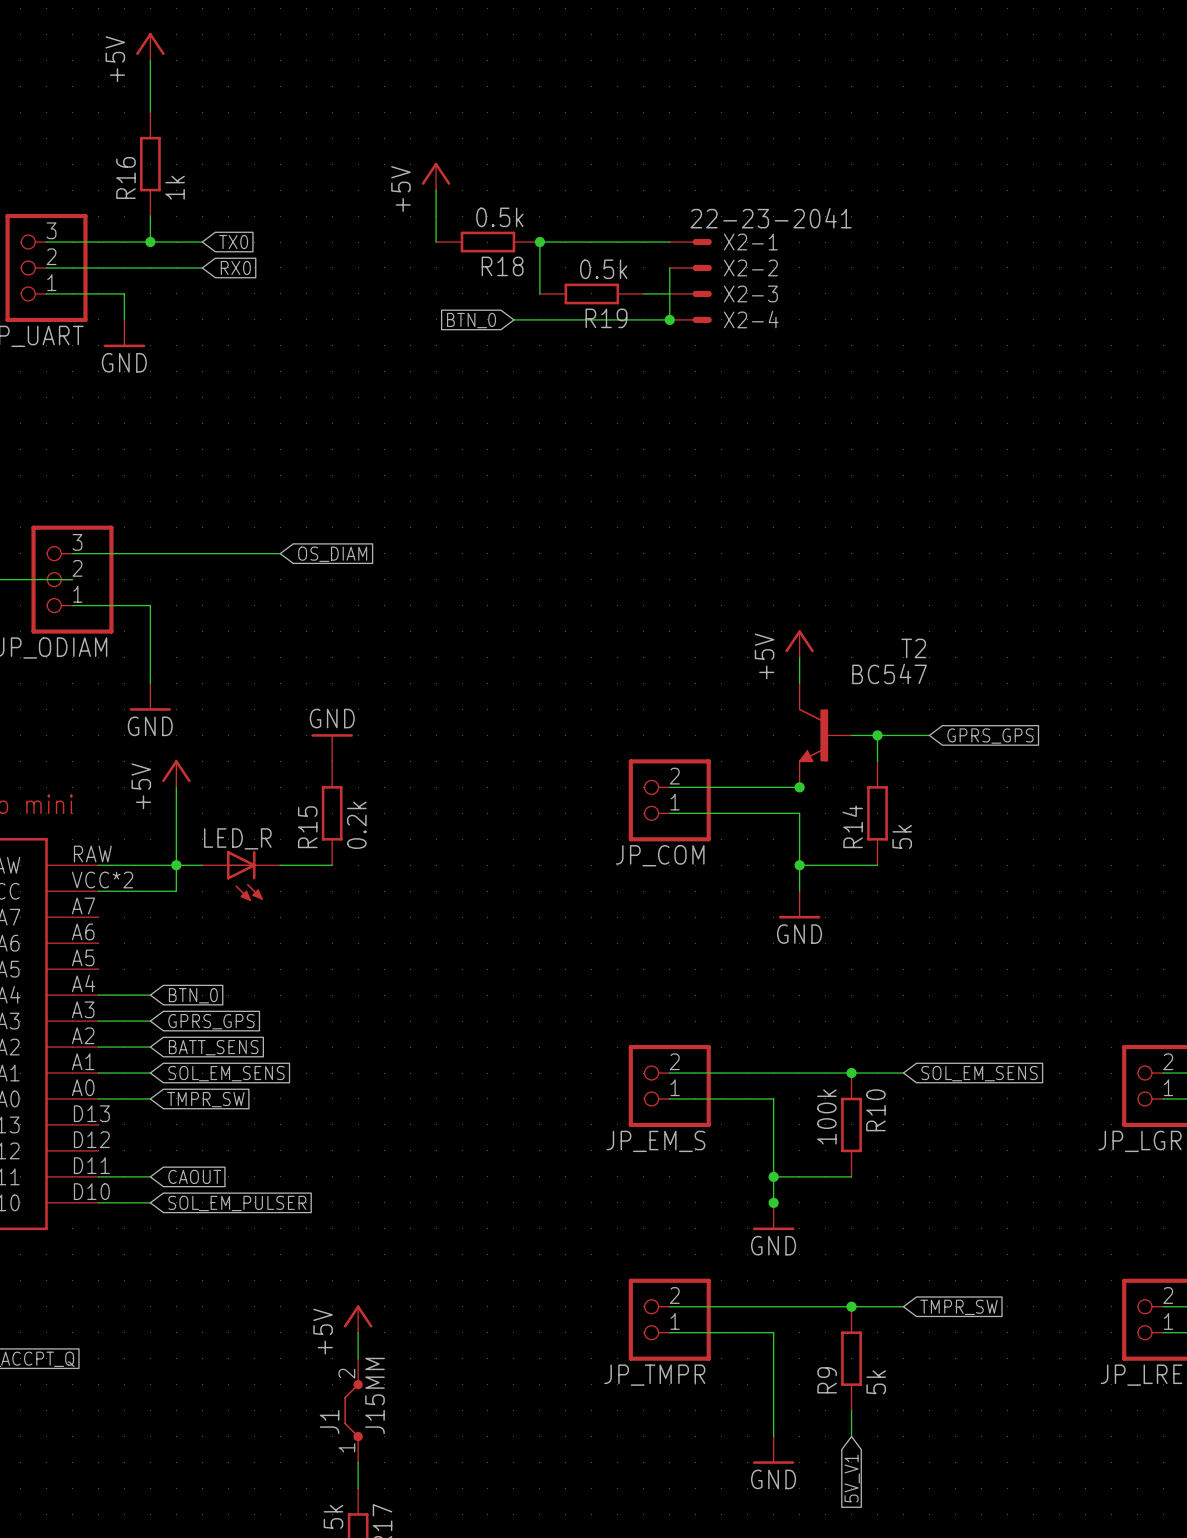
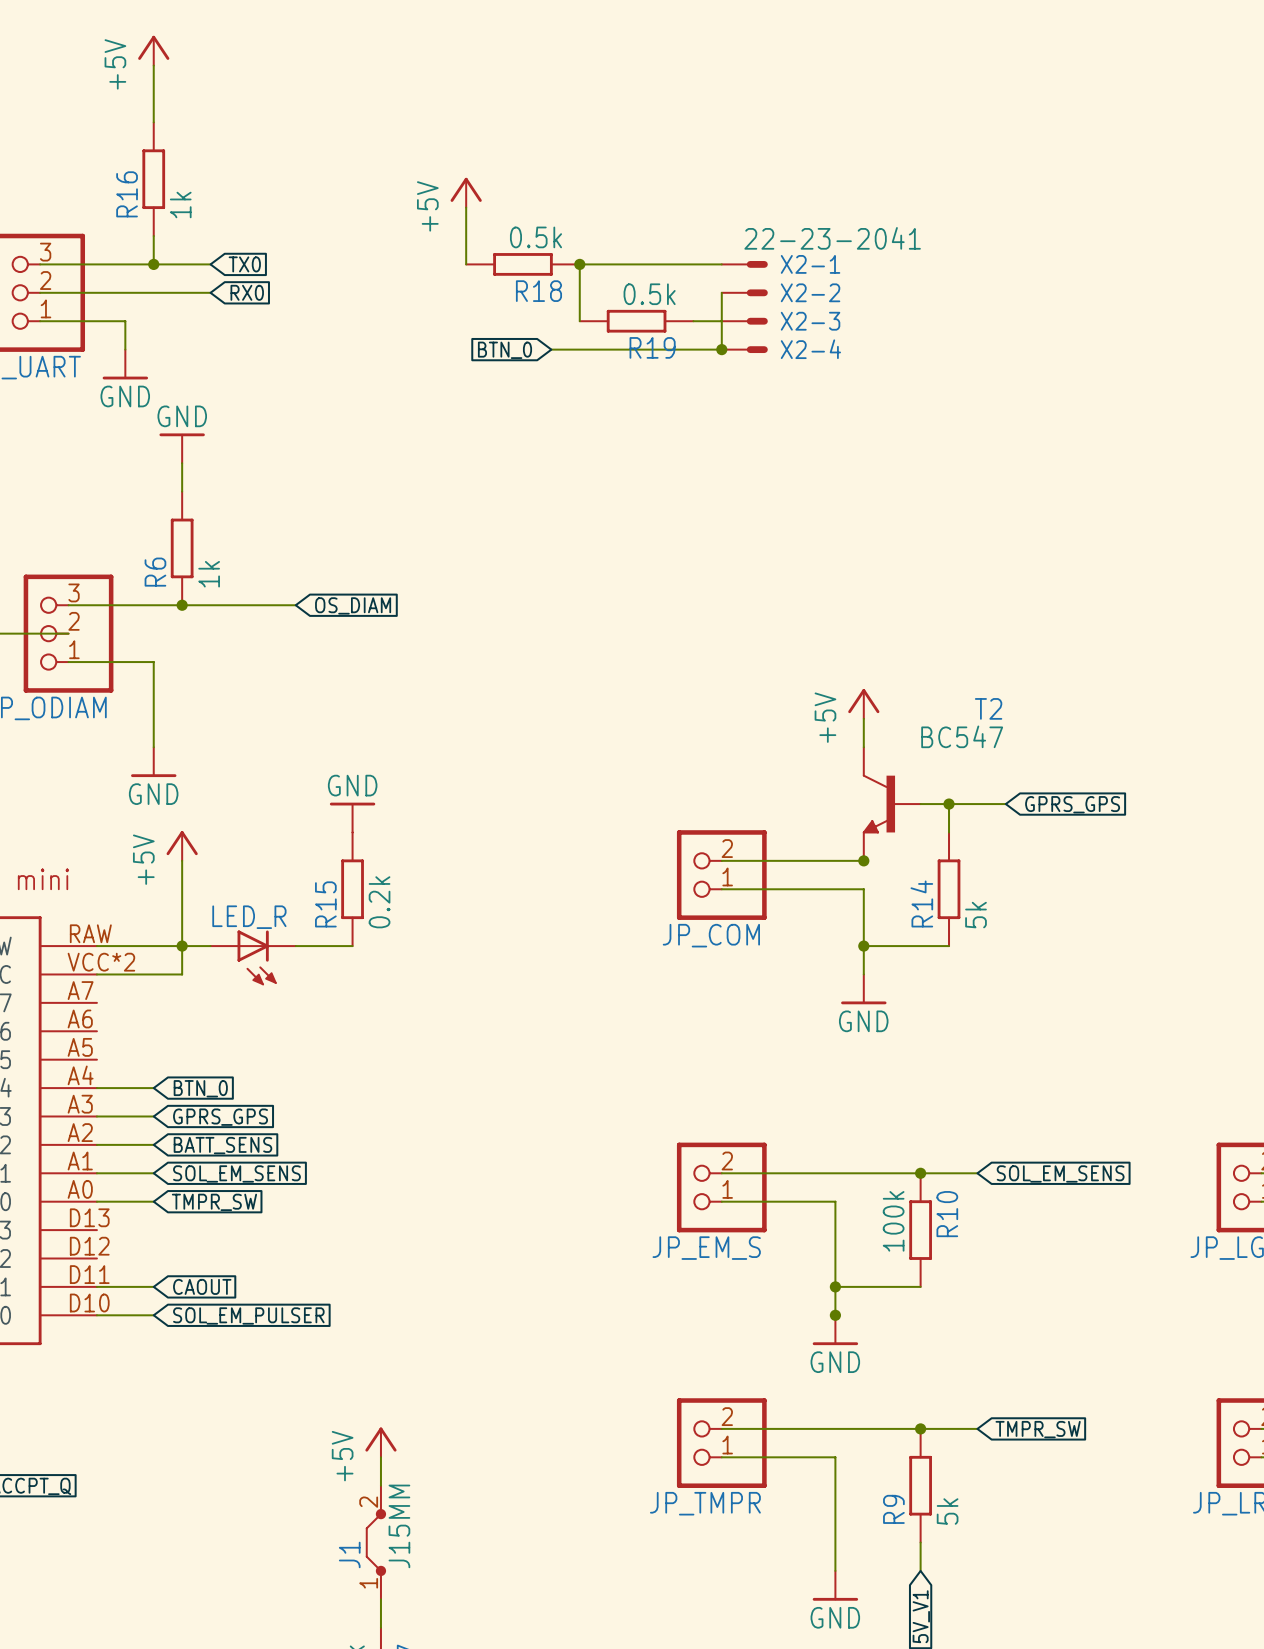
power symbol: none -> GND (182, 448)
wire: none -> (182, 463) (182, 491)
R6: none -> 1k (182, 548)
junction: none -> (182, 605)

